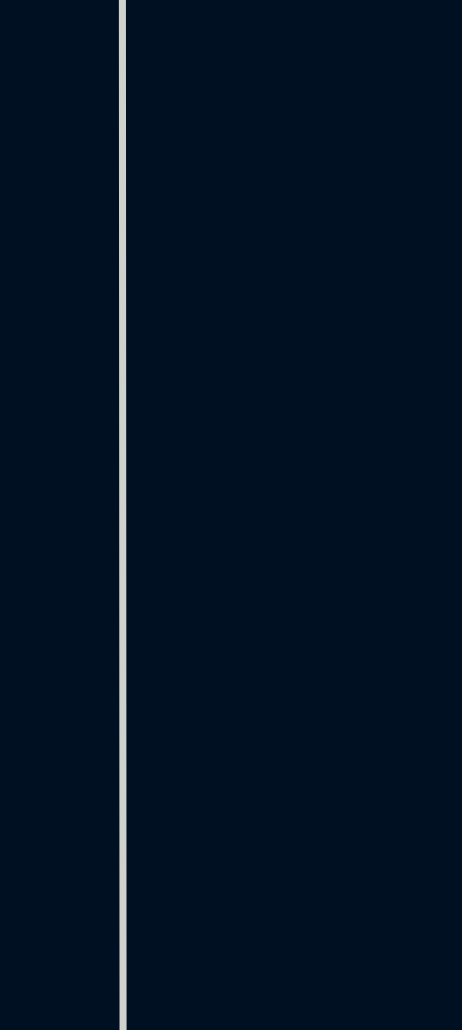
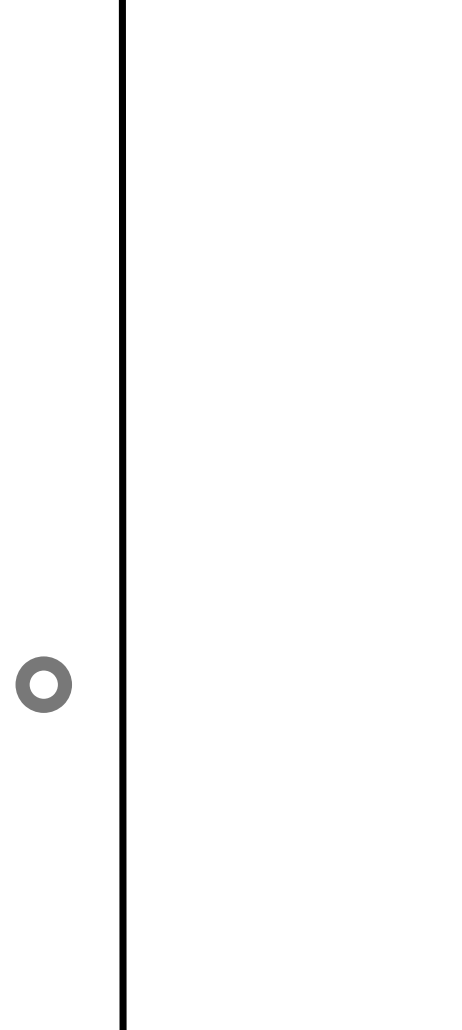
via: none -> (43, 684)

